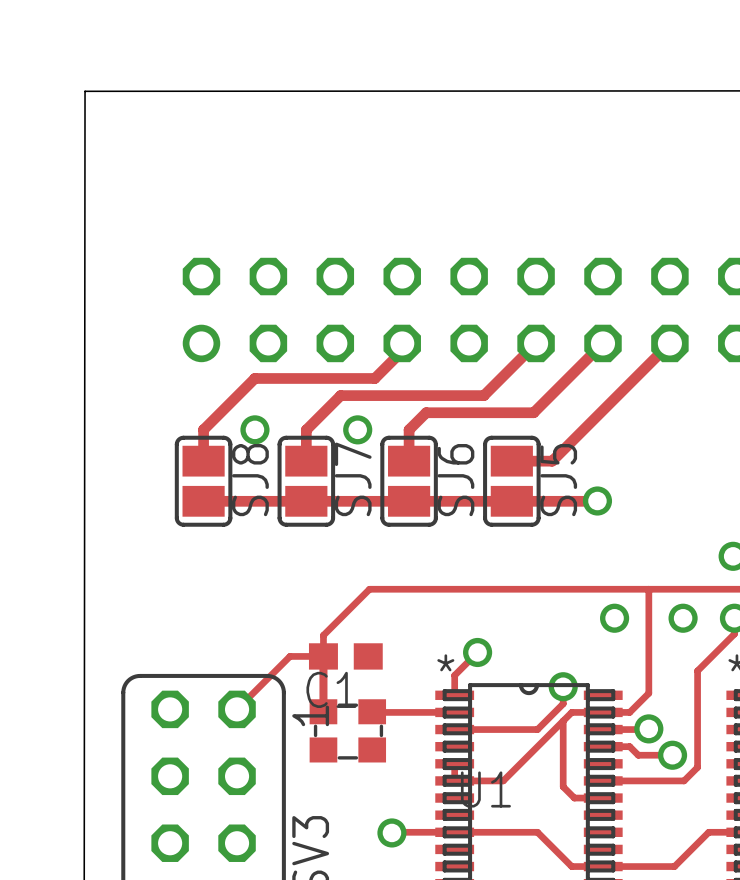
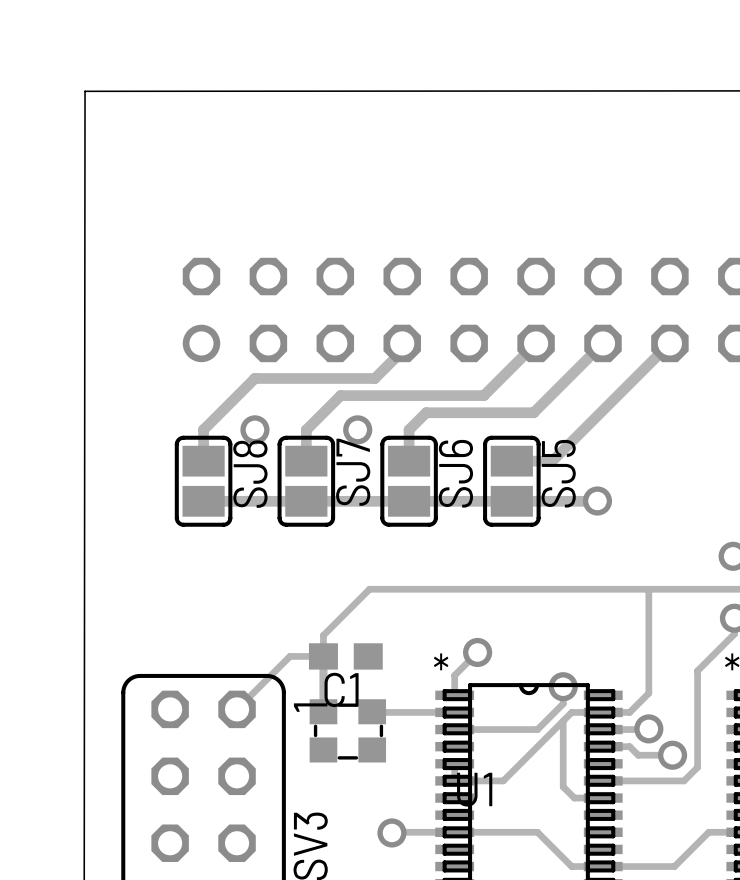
via: (614, 618) -> none
via: (683, 618) -> none

